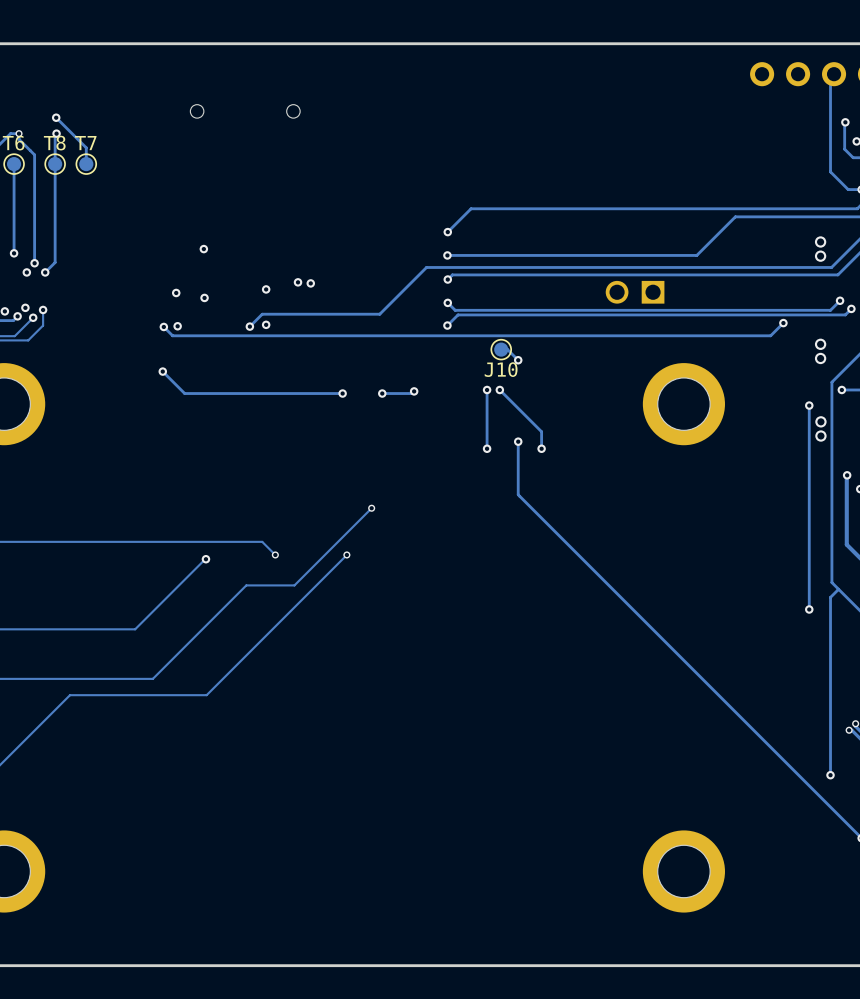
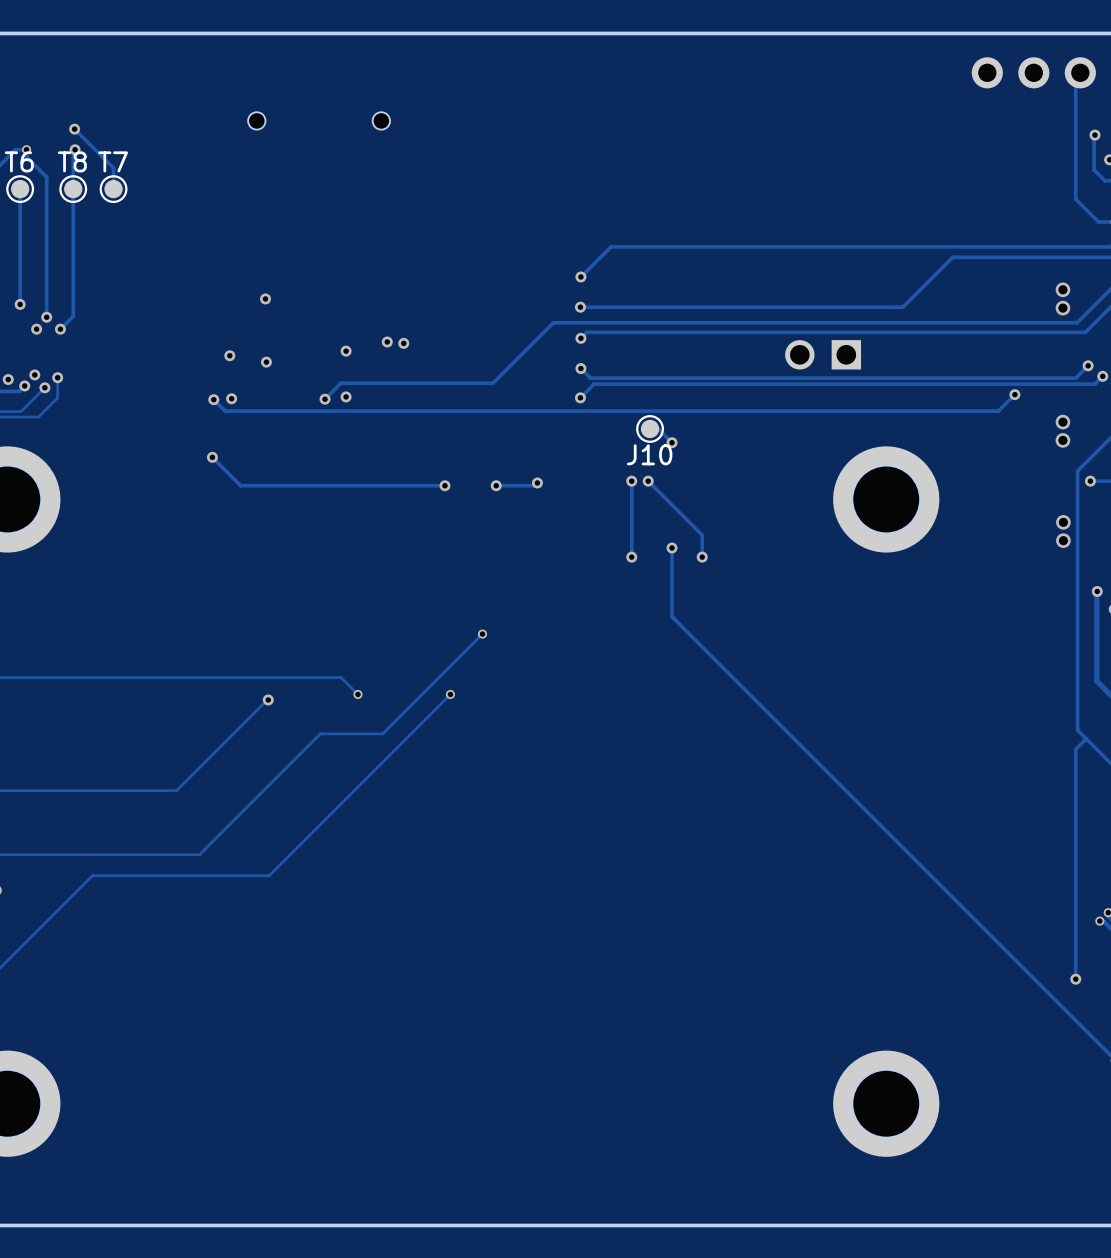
track: (809, 405) (809, 609) -> none
via: (809, 405) -> none
via: (809, 609) -> none

